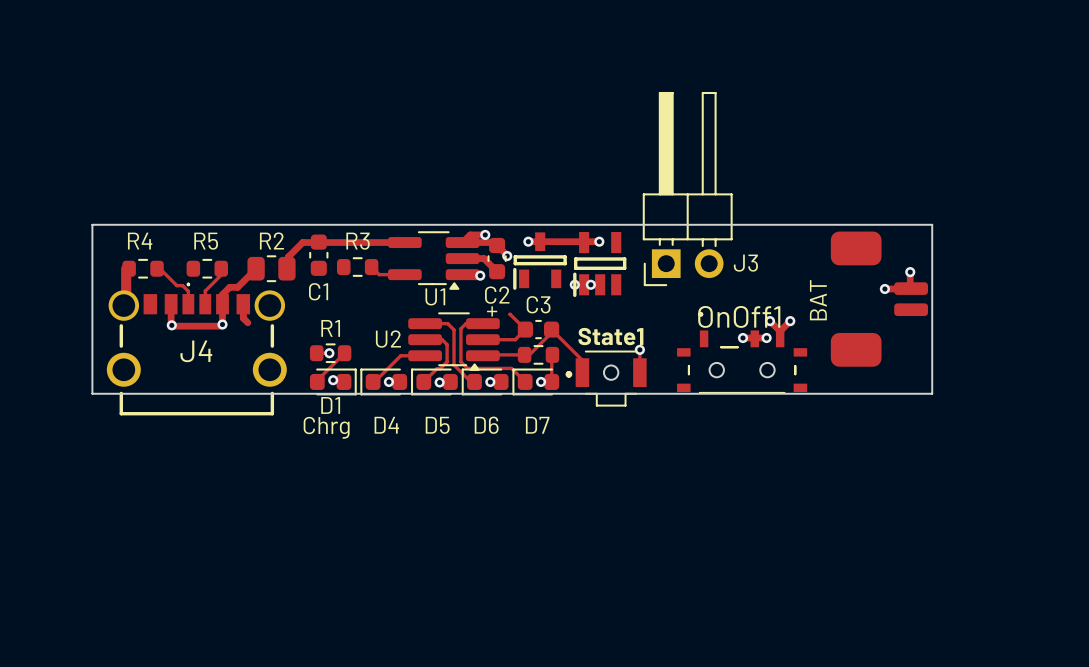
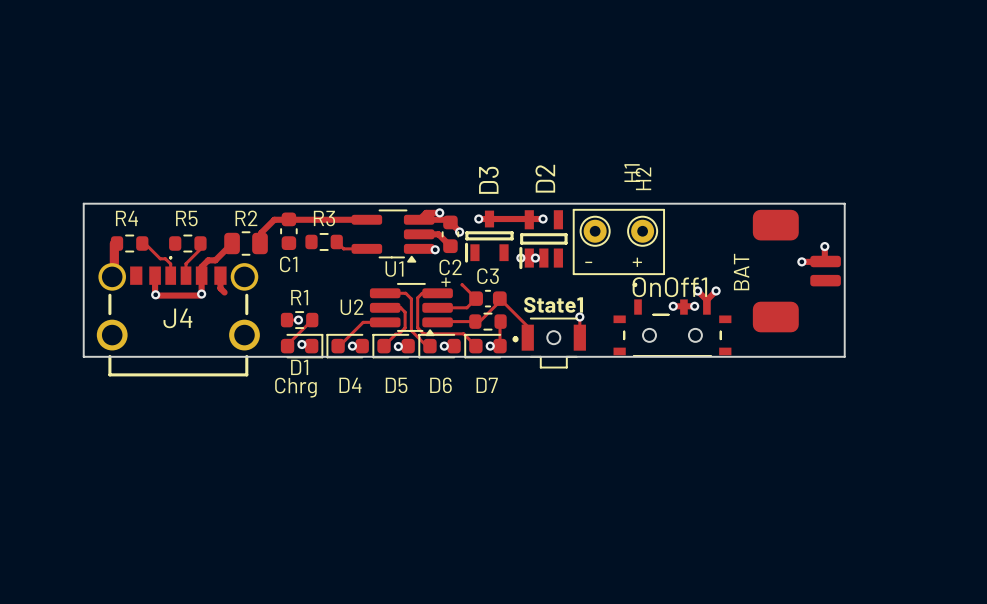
J3: (687, 189) -> none
D2 name: none -> D2 (545, 178)
D3 name: none -> D3 (488, 180)
line: none -> (573, 209) (664, 209) (664, 274) (573, 274) (573, 209)
H1: none -> (595, 231)
H2: none -> (642, 231)
text: none -> - (588, 262)
text: none -> + (637, 262)

